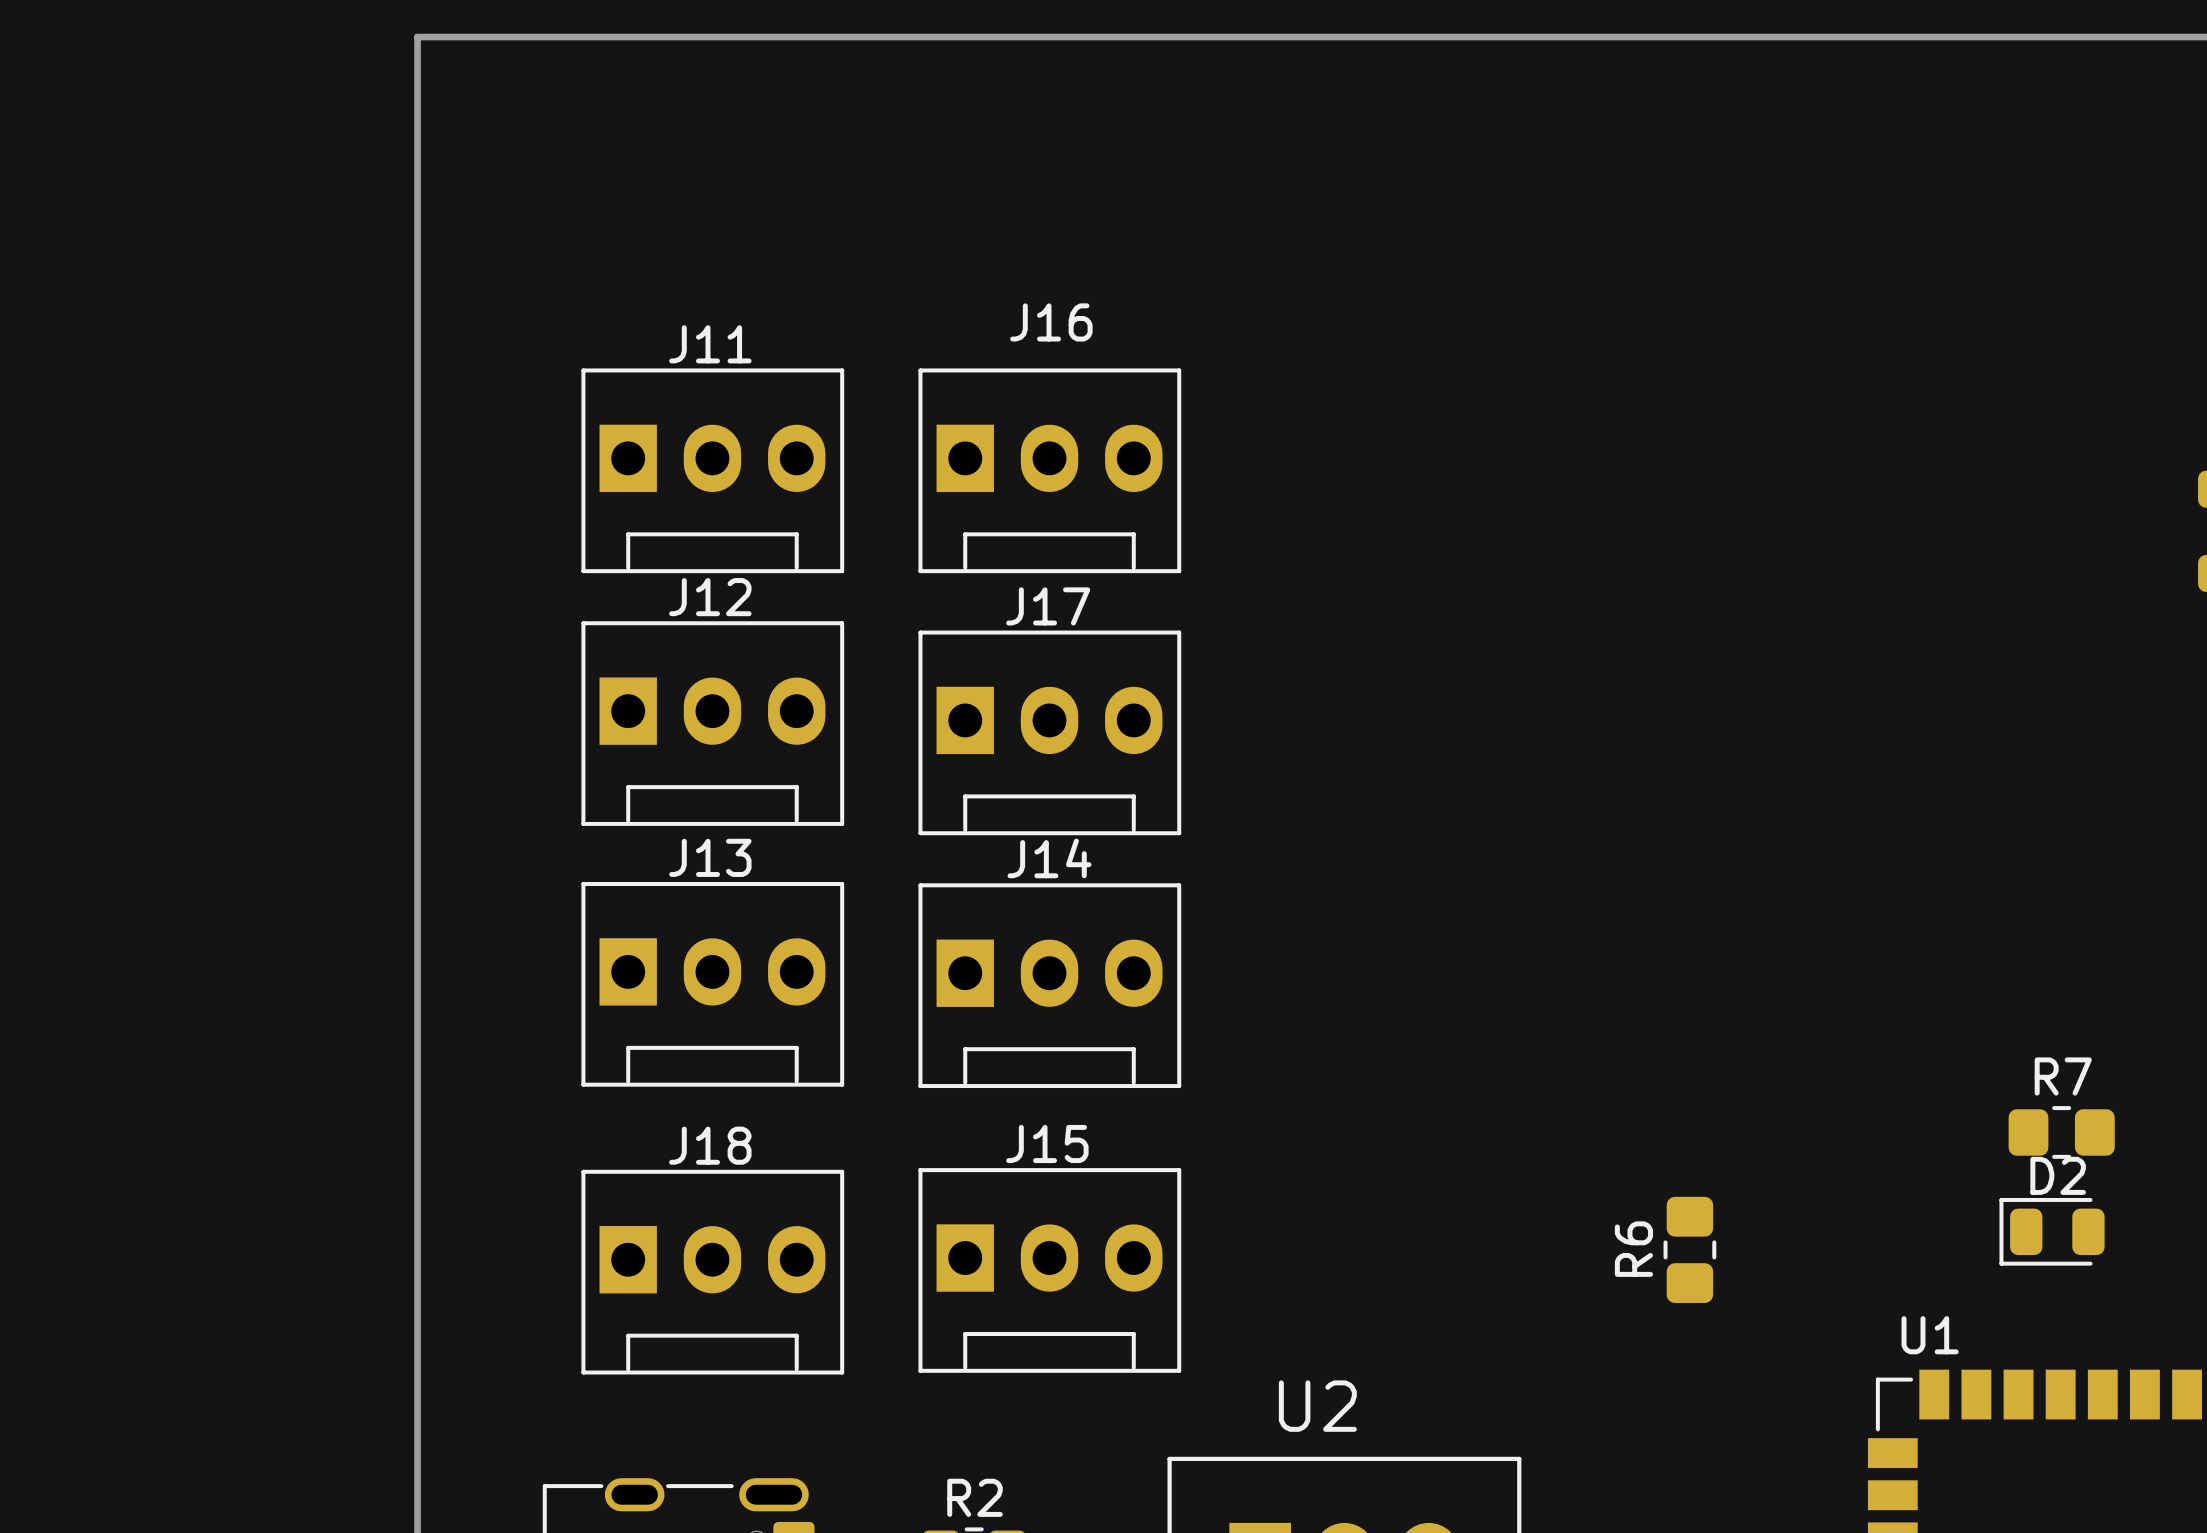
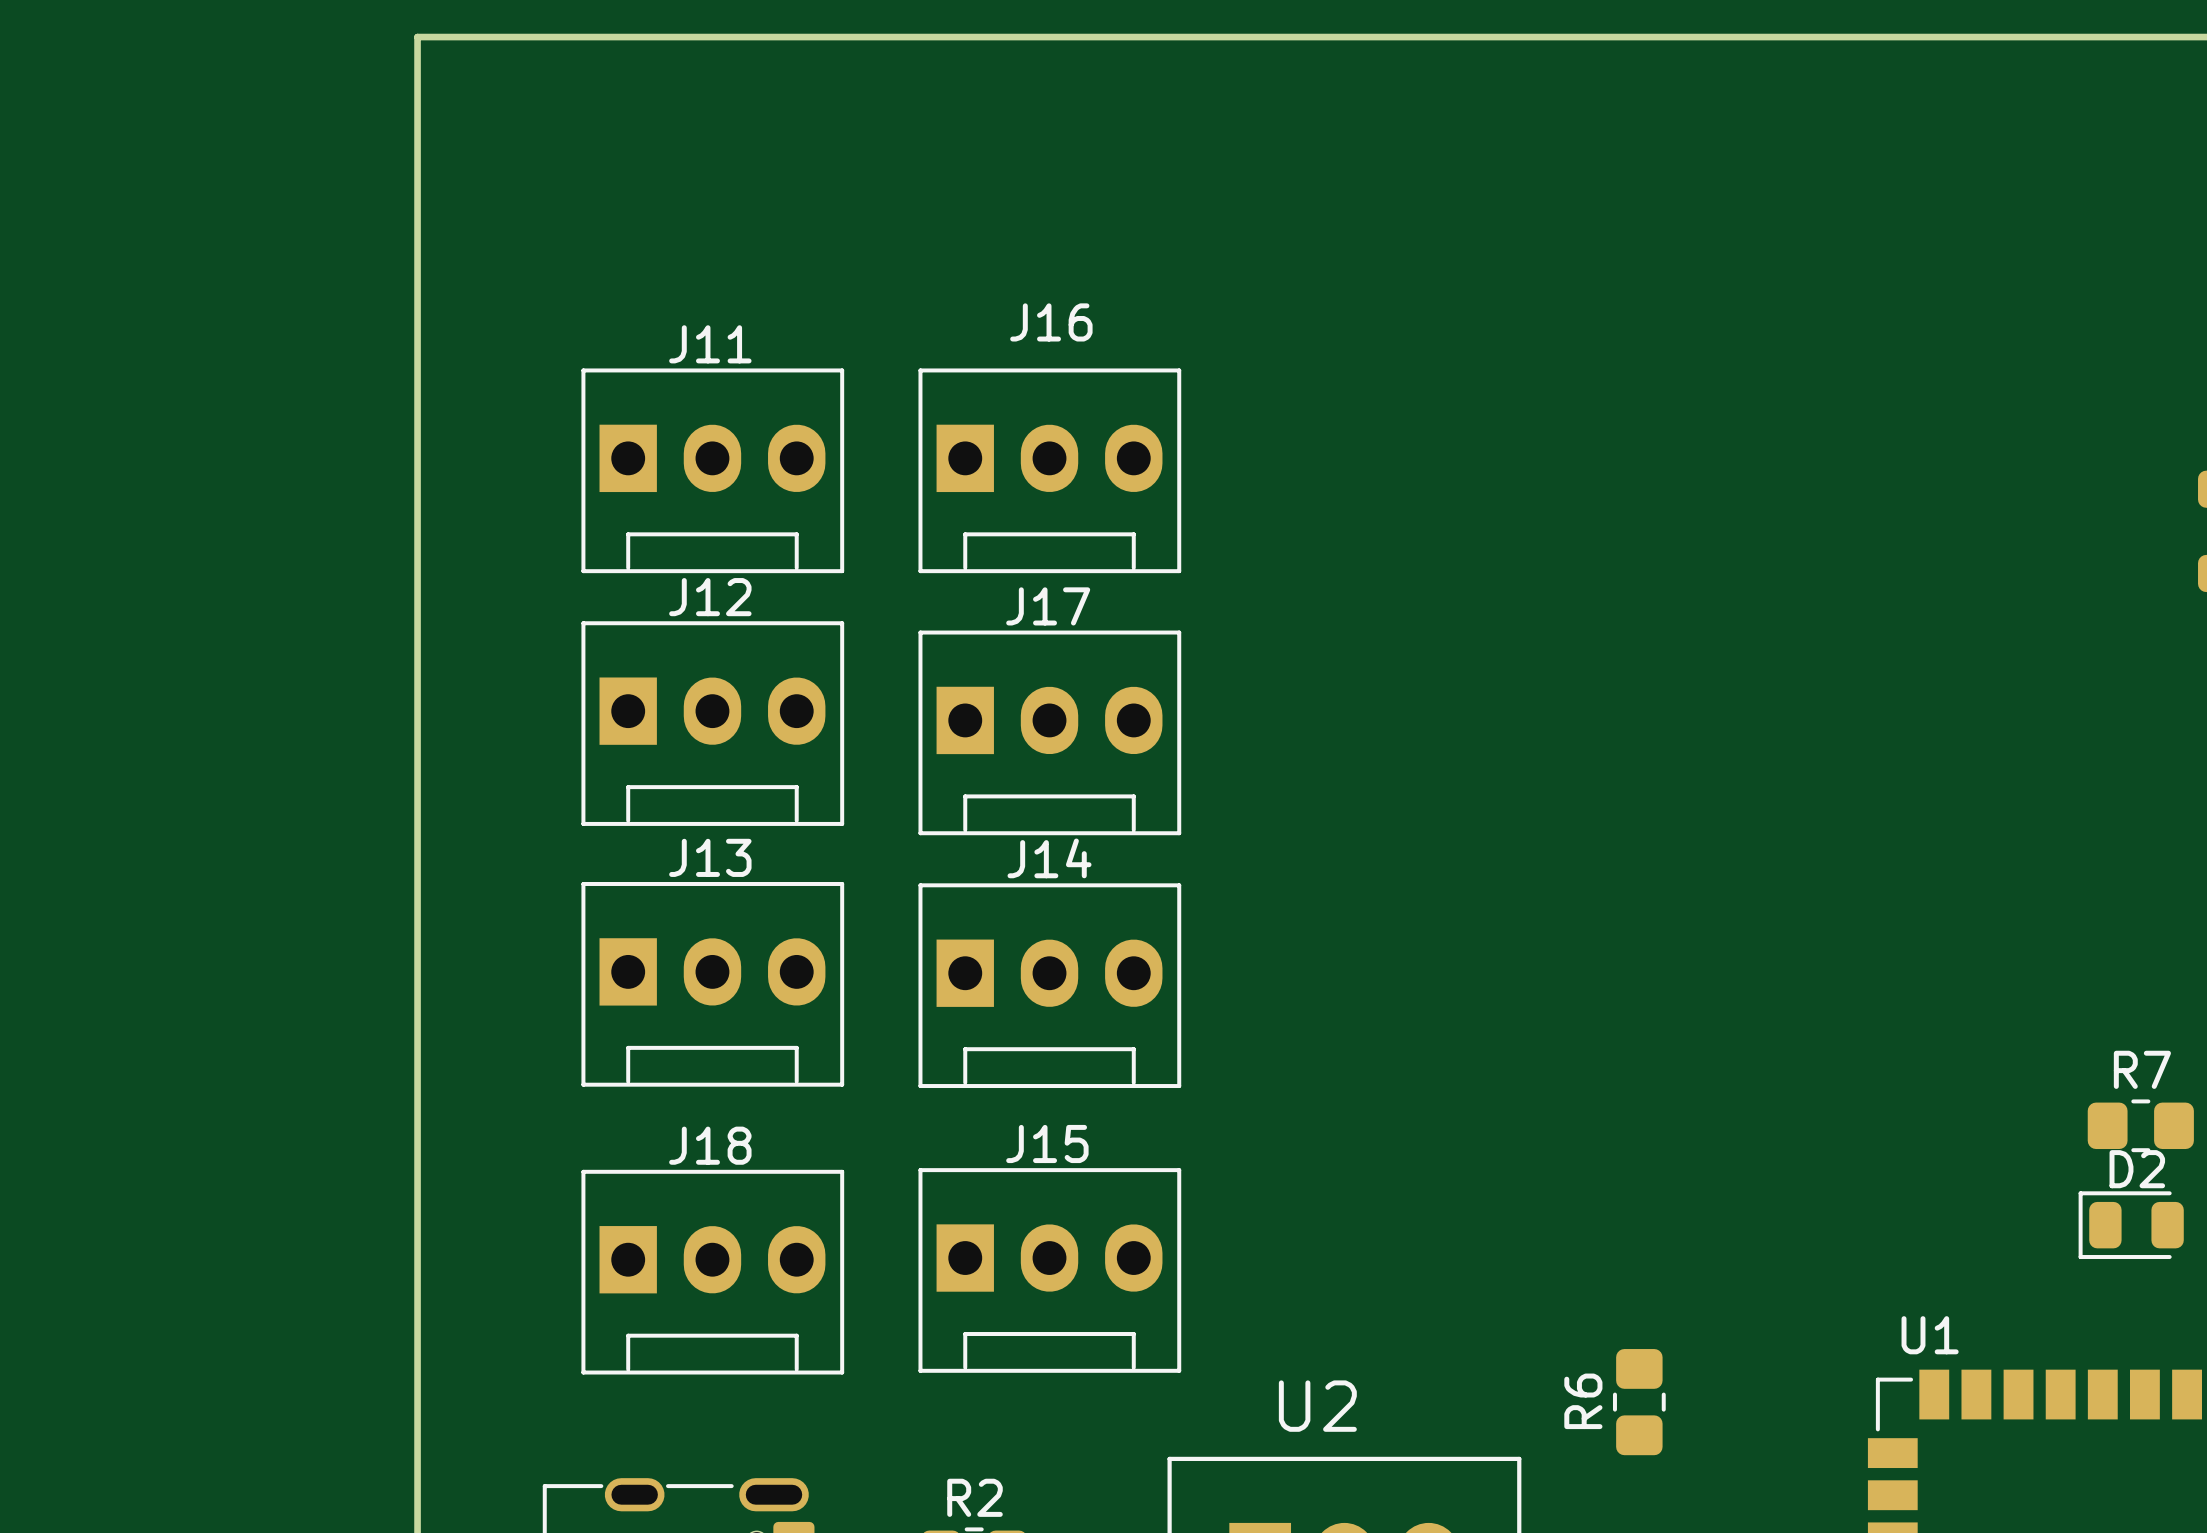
R7 position: (2061, 1132) -> (2140, 1125)
D2 position: (2052, 1231) -> (2131, 1225)
R6 position: (1689, 1249) -> (1639, 1402)

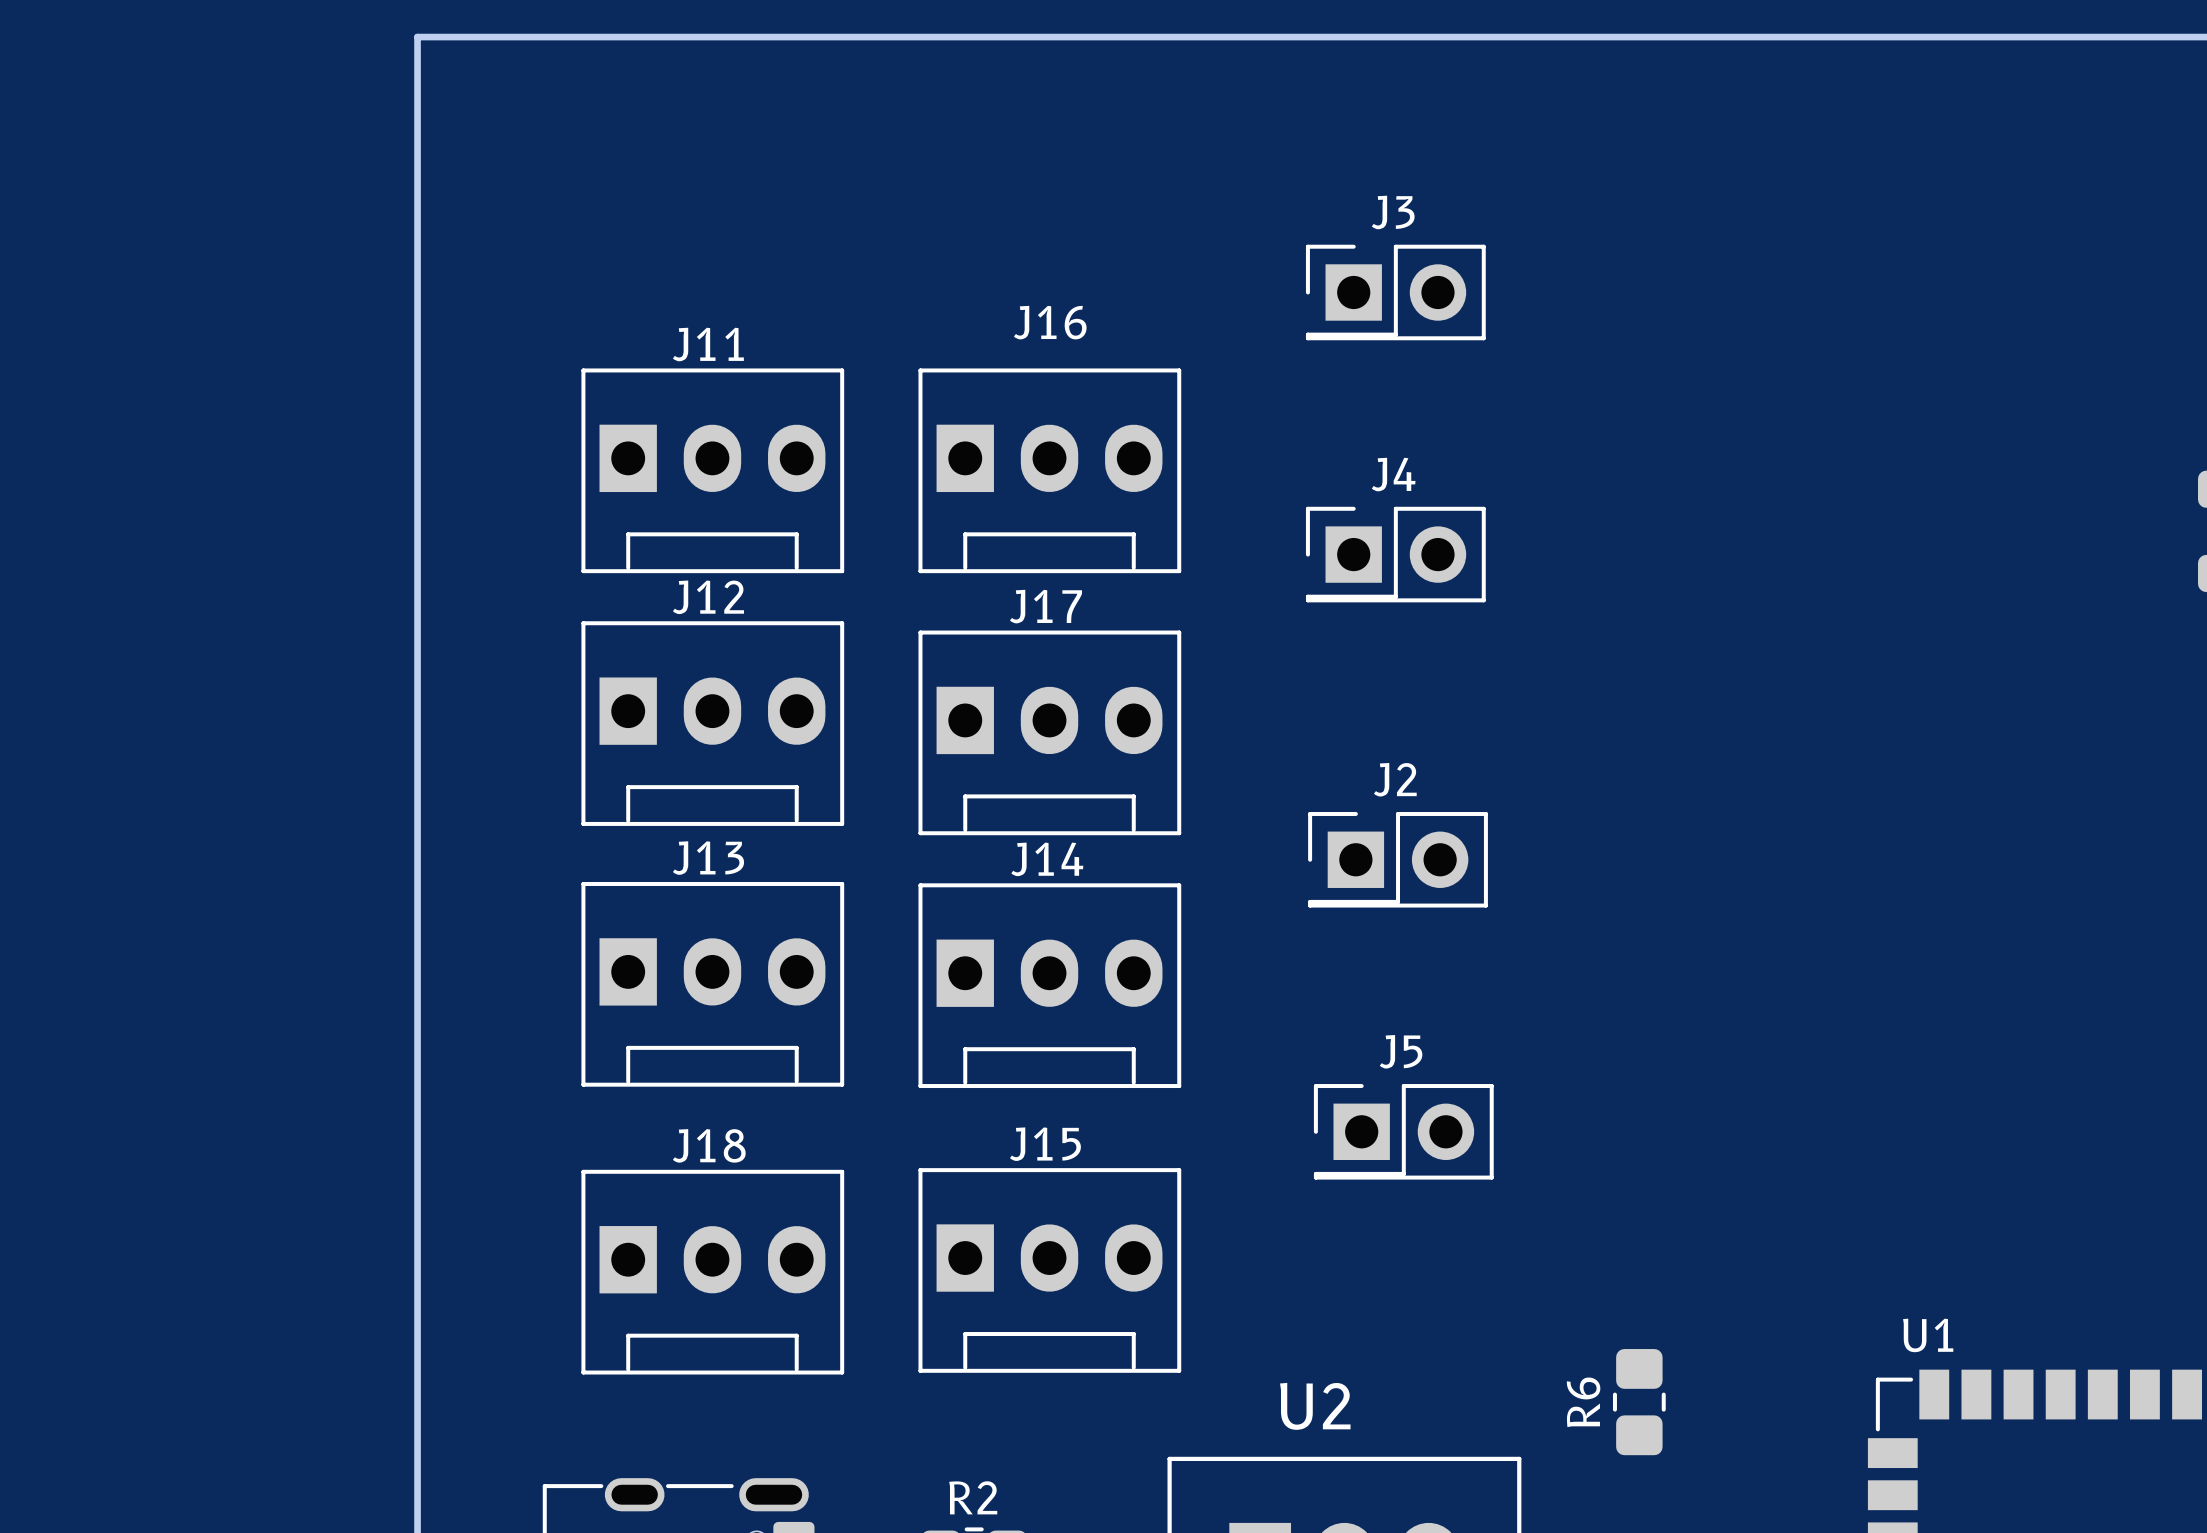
J3: none -> (1395, 292)
J4: none -> (1395, 554)
J2: none -> (1398, 859)
R7: (2140, 1125) -> none
J5: none -> (1403, 1131)
D2: (2131, 1225) -> none

